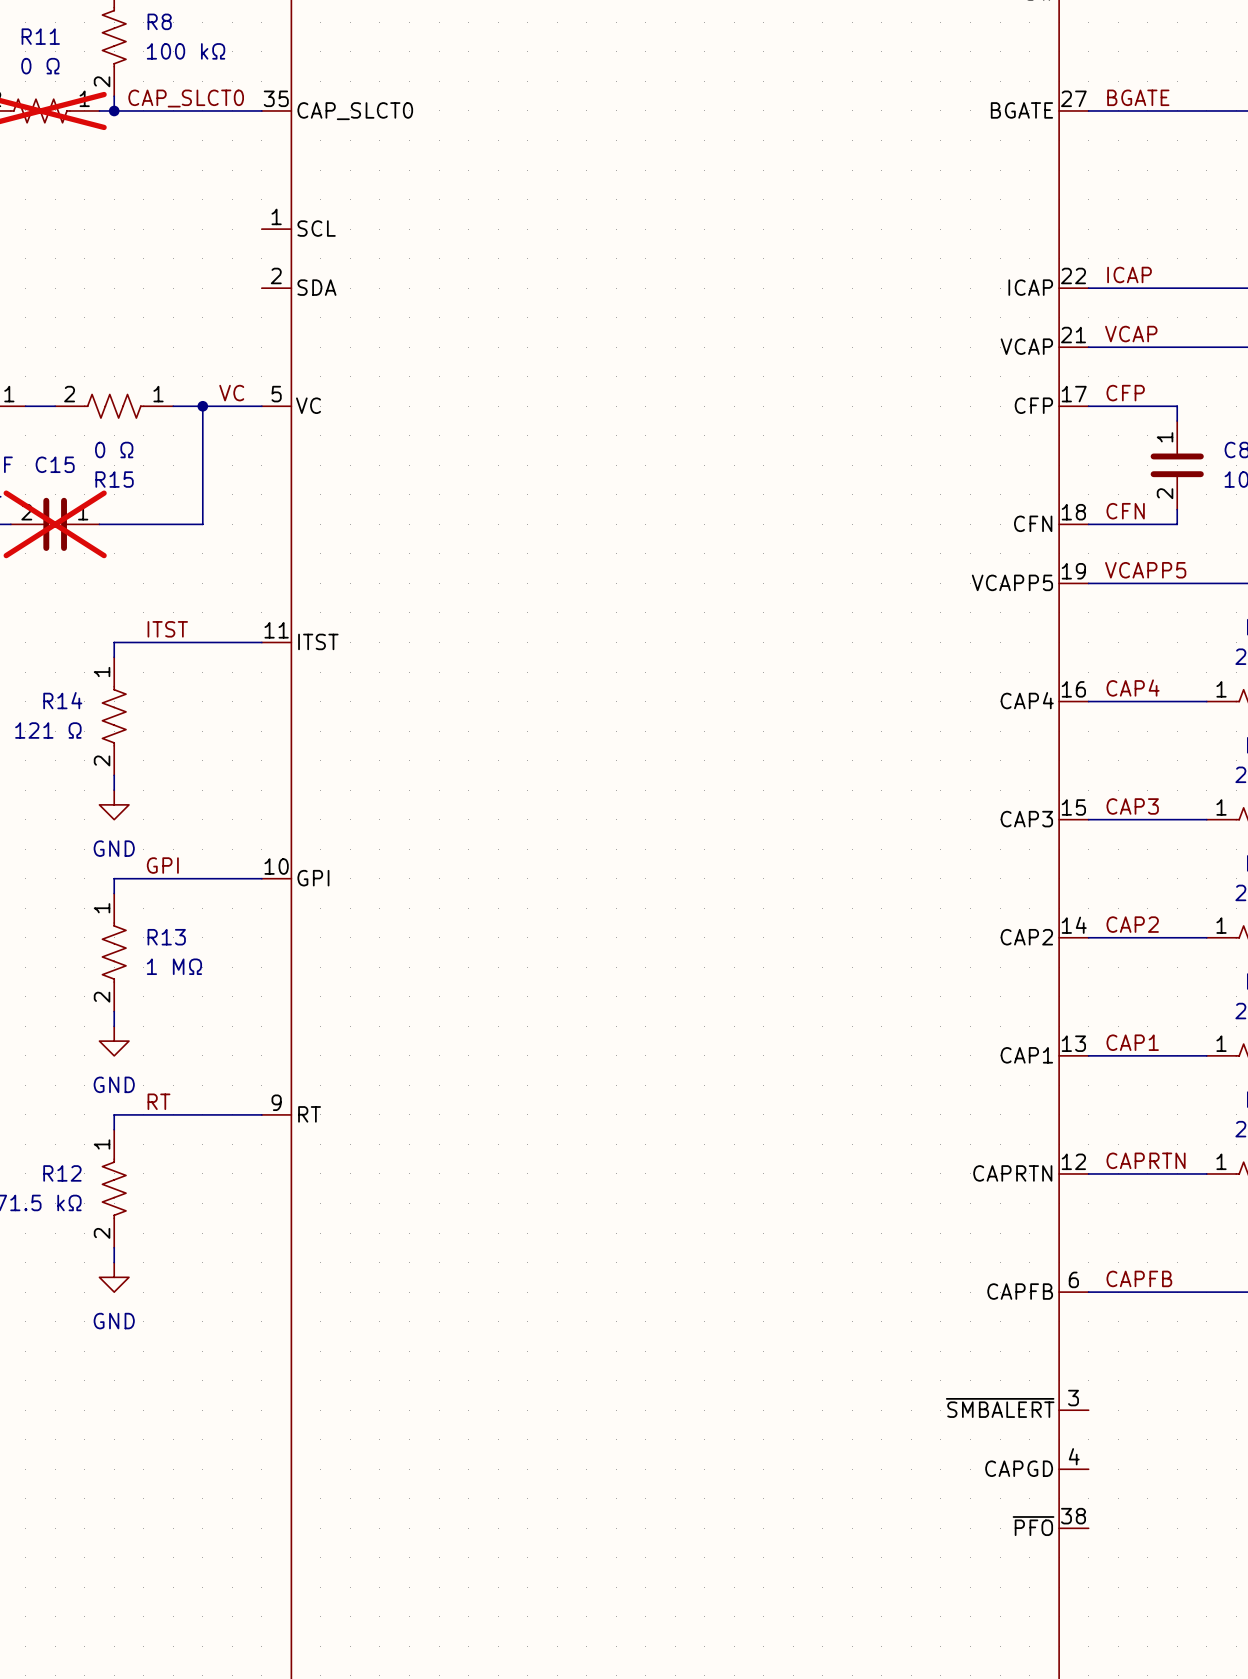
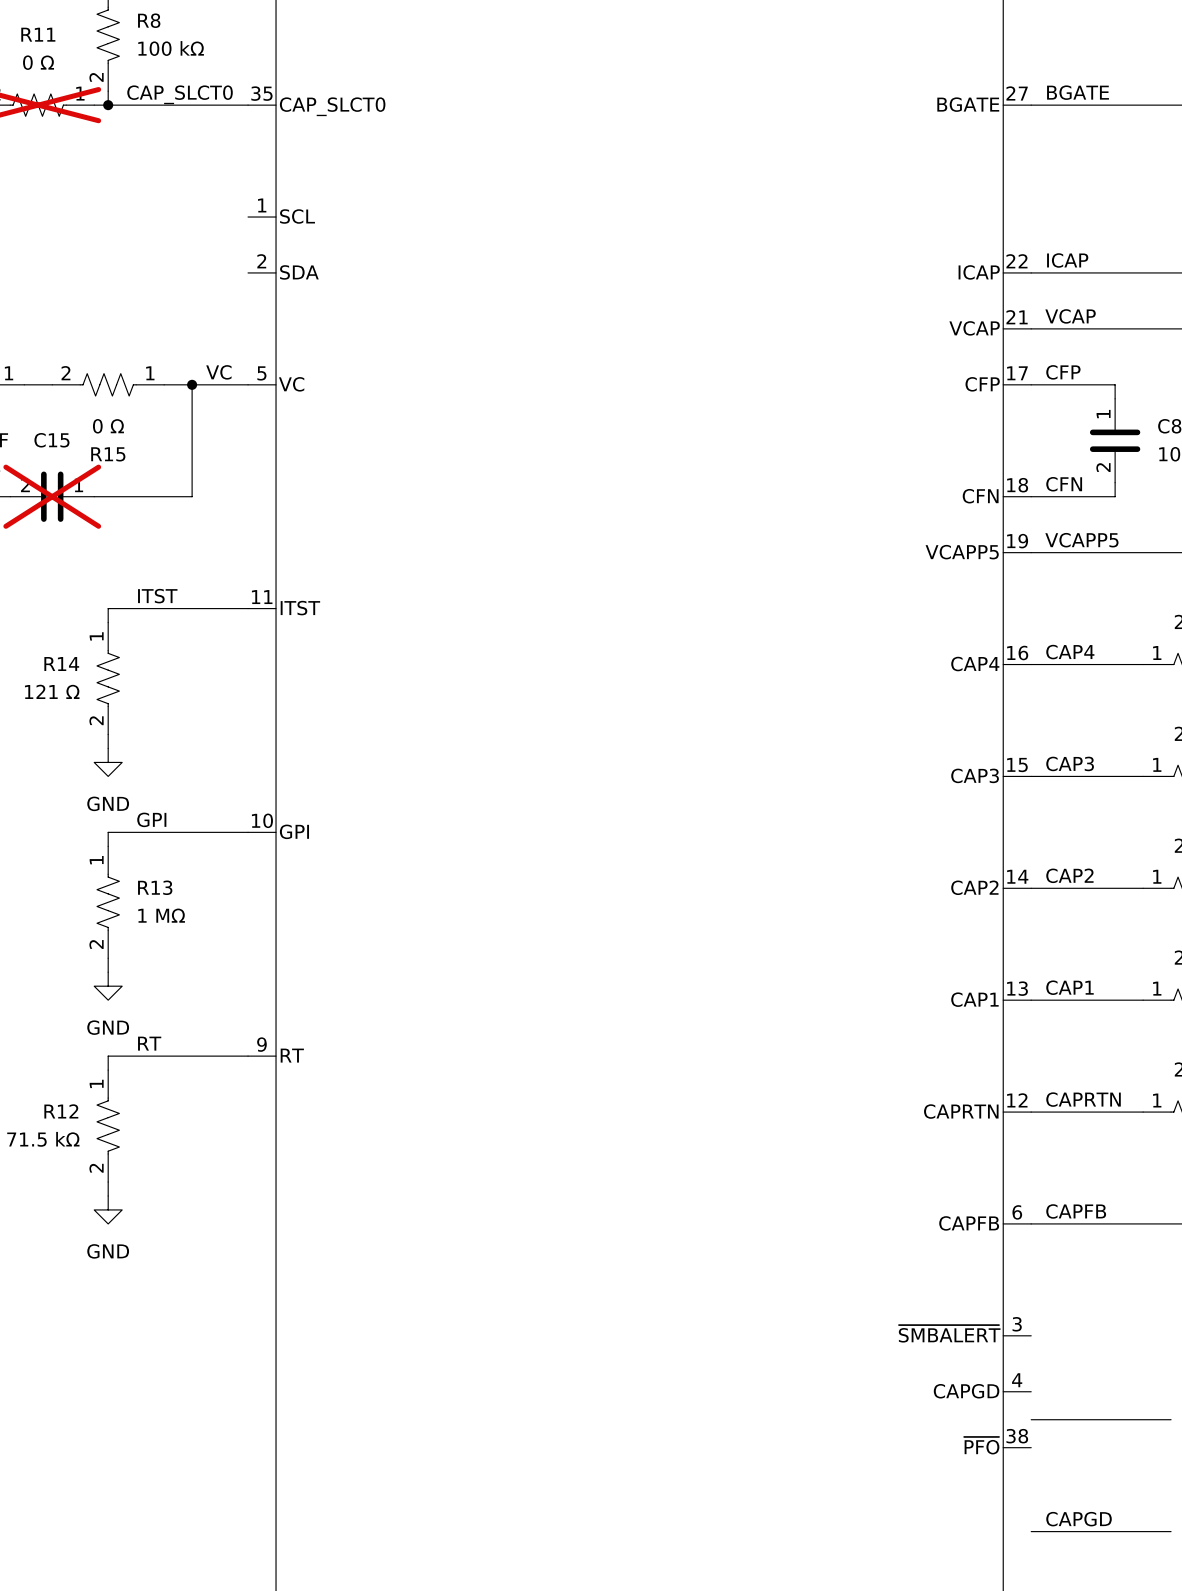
wire: none -> (1031, 1419) (1171, 1419)
label: none -> CAPGD (1079, 1519)
wire: none -> (1031, 1531) (1171, 1531)

